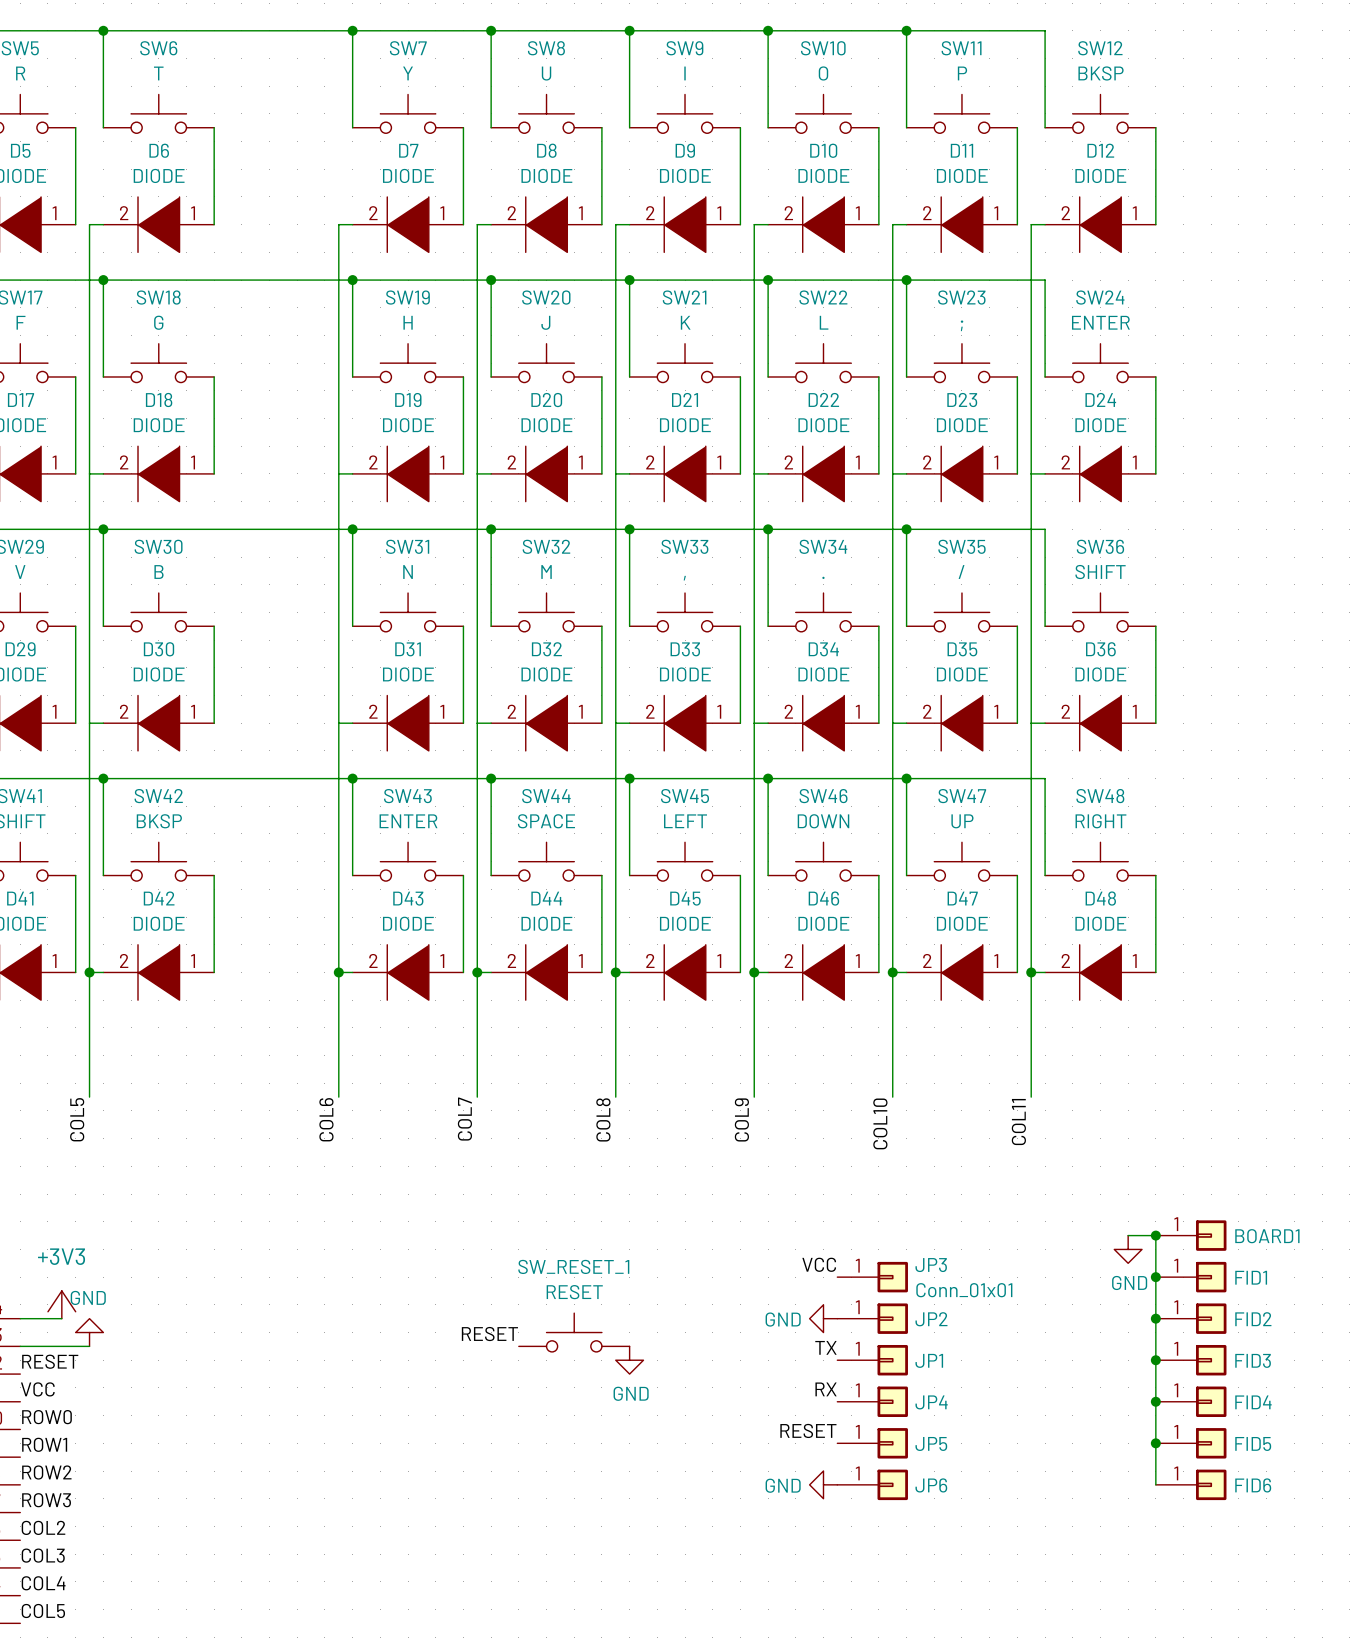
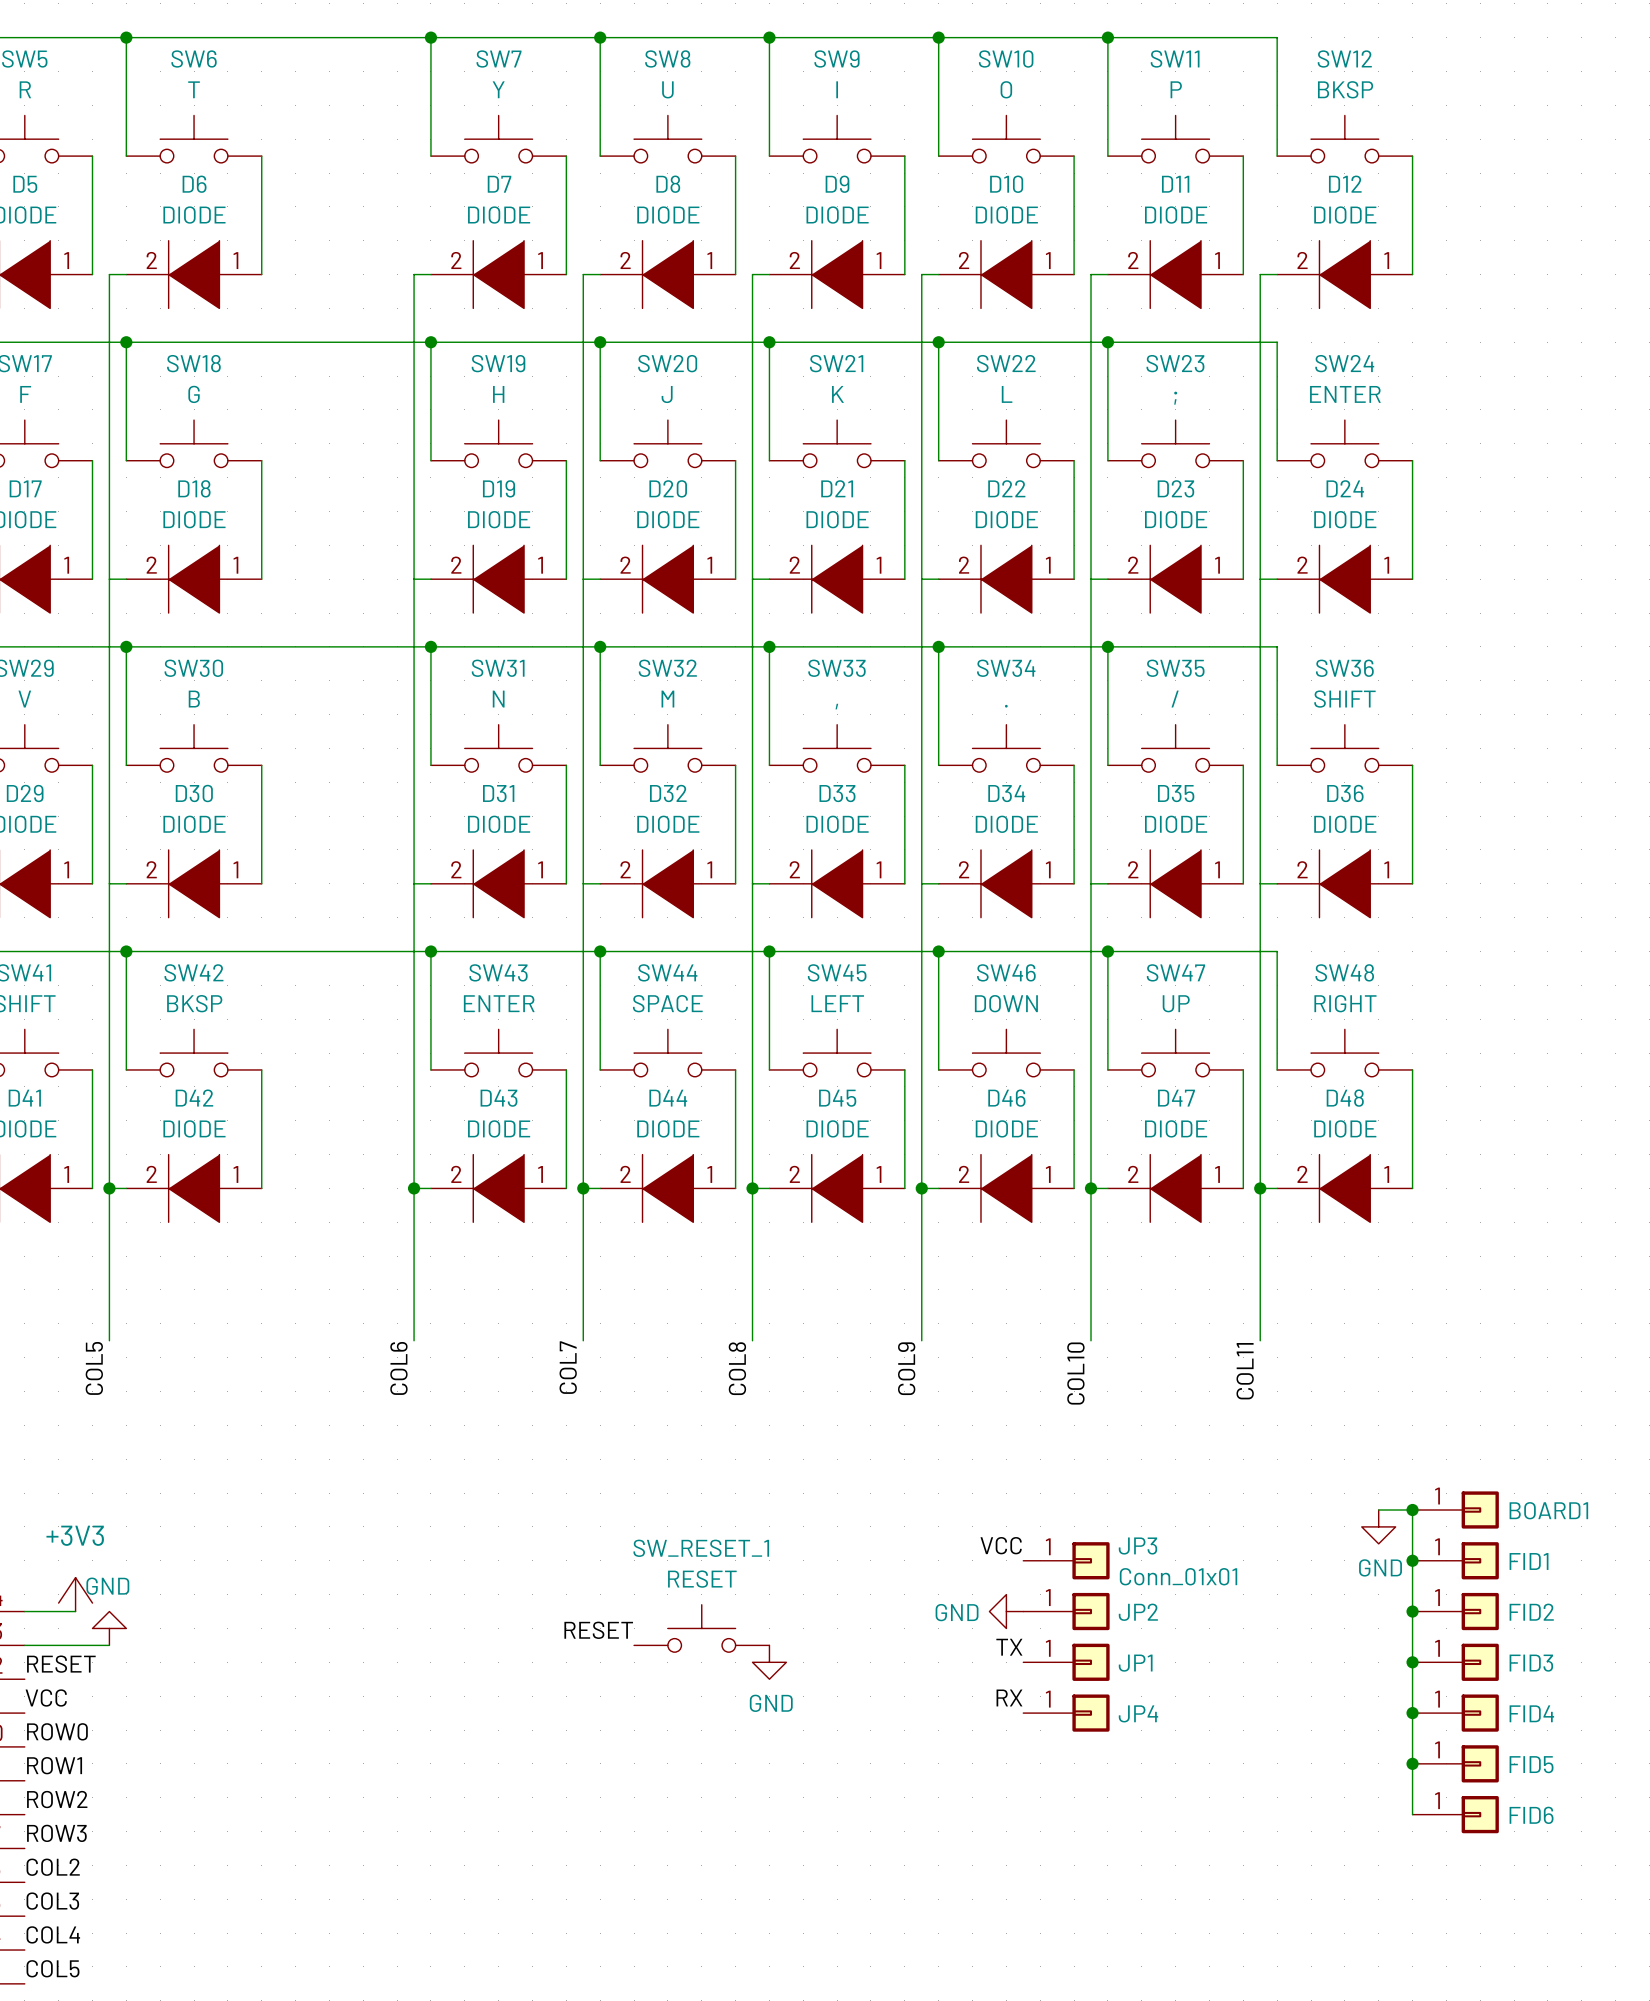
label: RESET (808, 1430) -> none
JP5: (872, 1443) -> none
power symbol: GND (823, 1484) -> none
JP6: (872, 1484) -> none

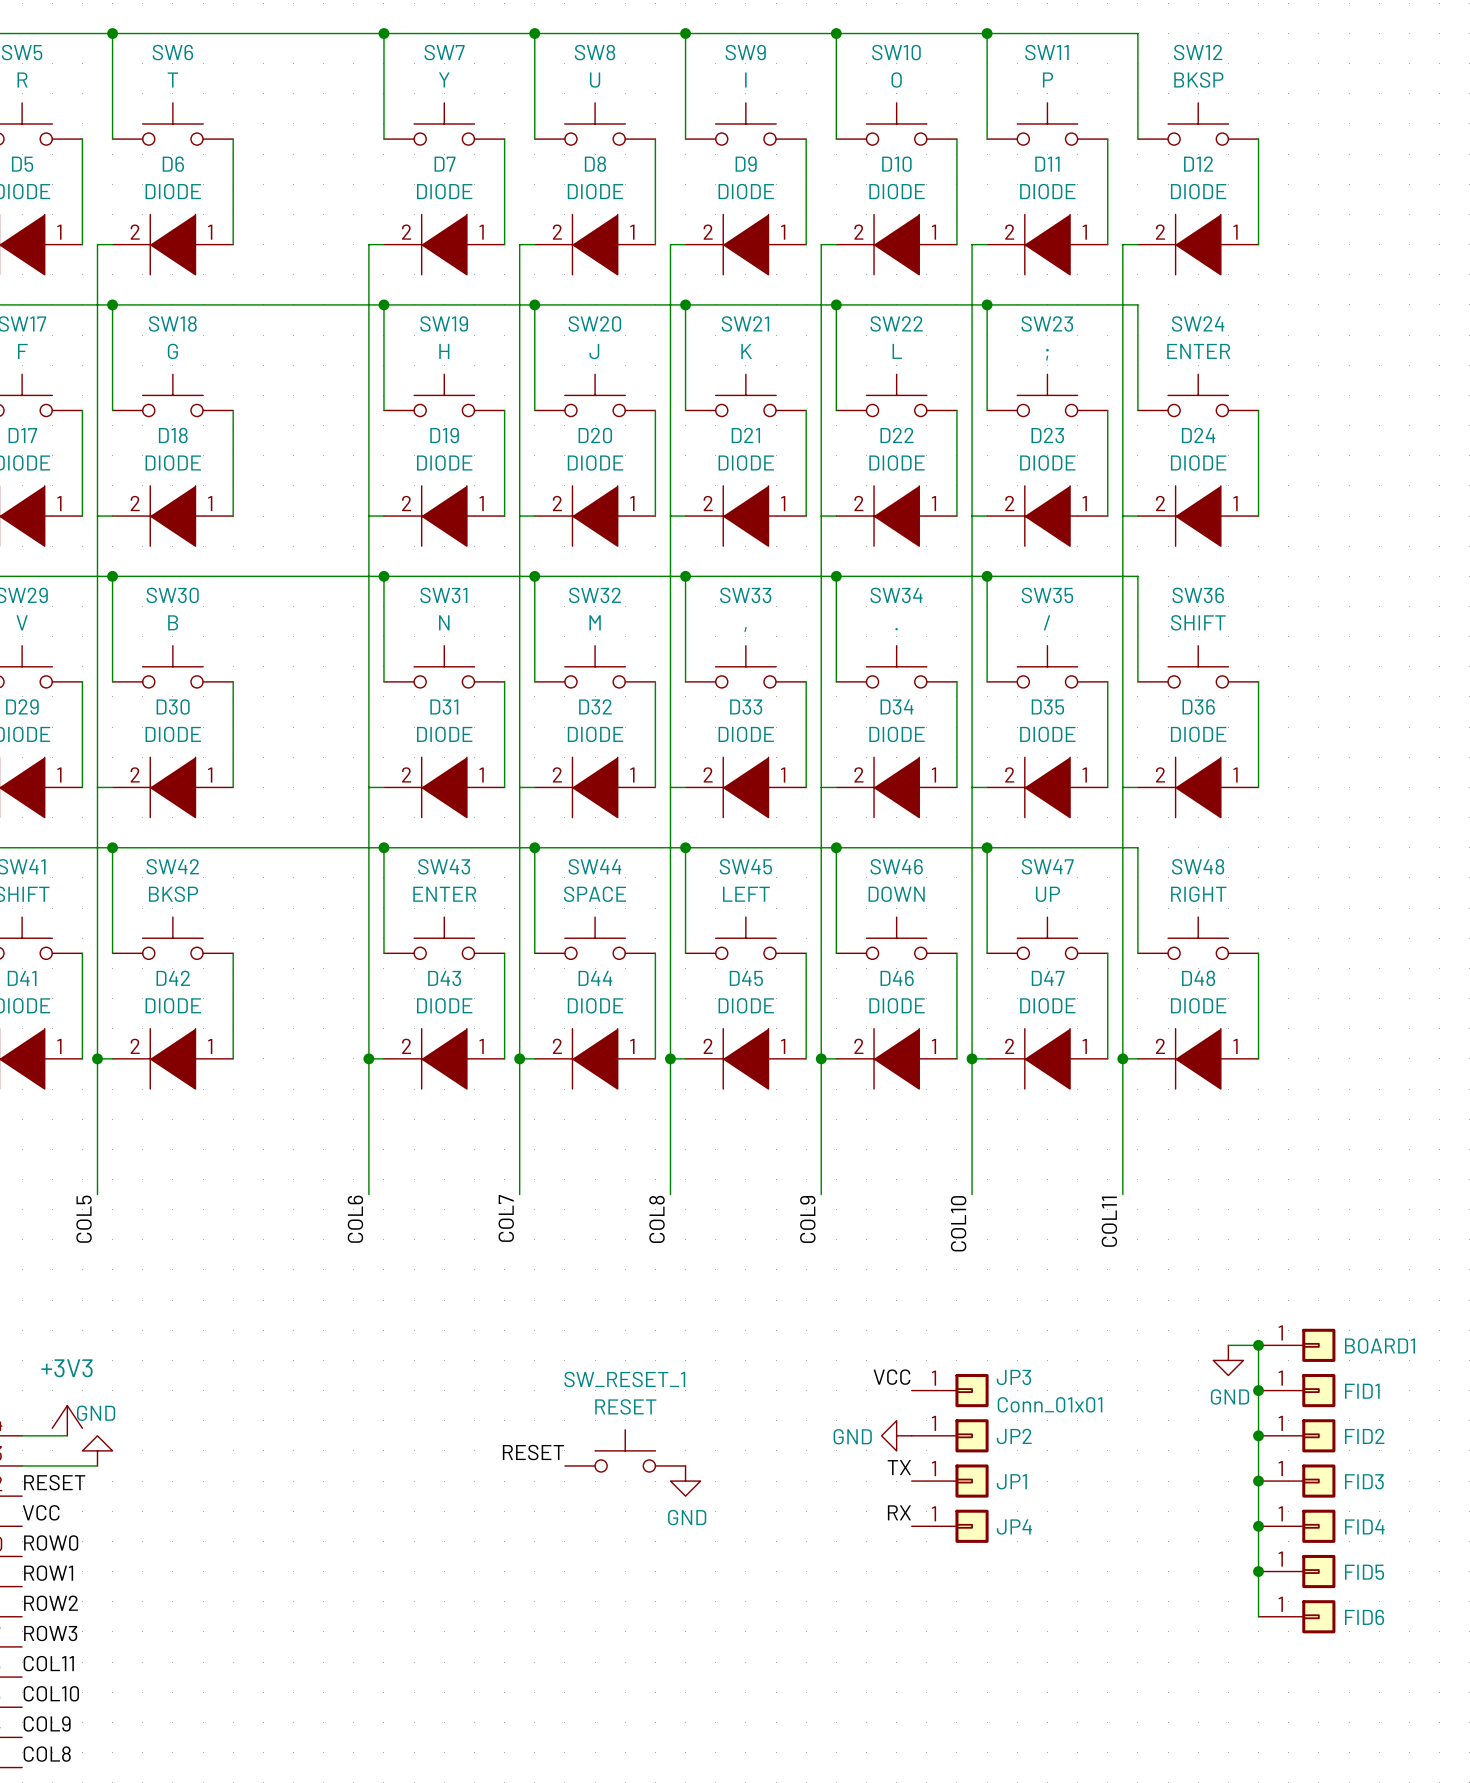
label: COL2 (53, 1867) -> COL11 (48, 1663)
label: COL3 (52, 1901) -> COL10 (51, 1693)
label: COL4 (53, 1934) -> COL9 (47, 1723)
label: COL5 (53, 1968) -> COL8 (47, 1754)

